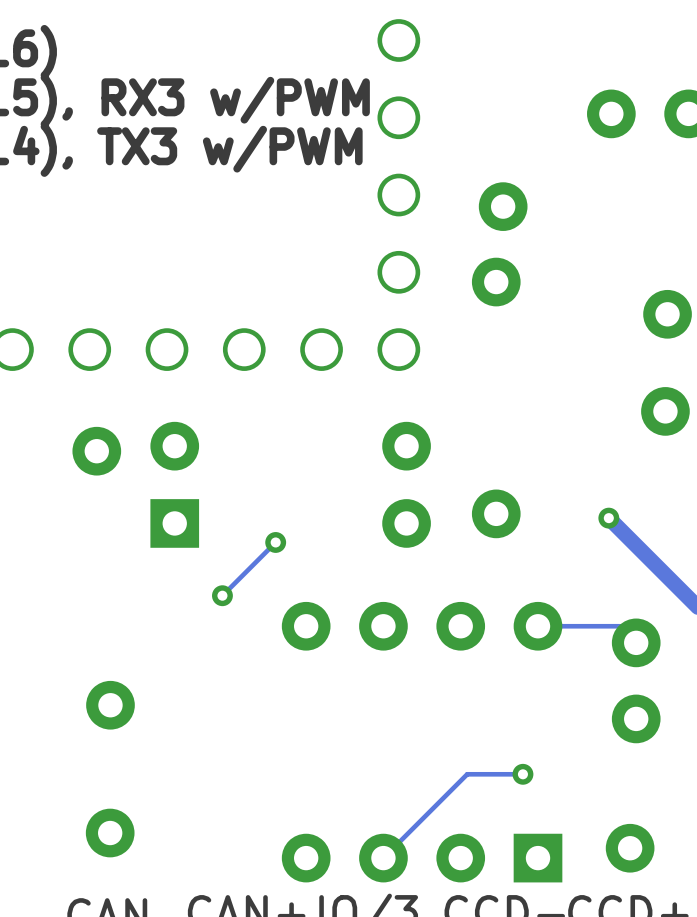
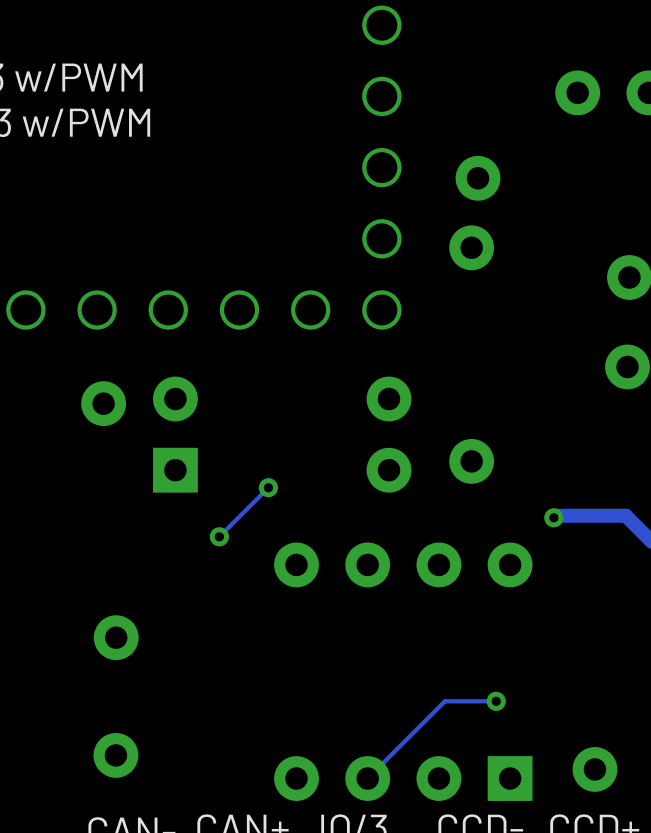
track: (608, 518) (663, 572) -> (553, 517) (555, 515) (625, 515)
via position: (608, 518) -> (553, 517)
track: (538, 626) (619, 626) (636, 642) -> none
part: (636, 680) -> none

